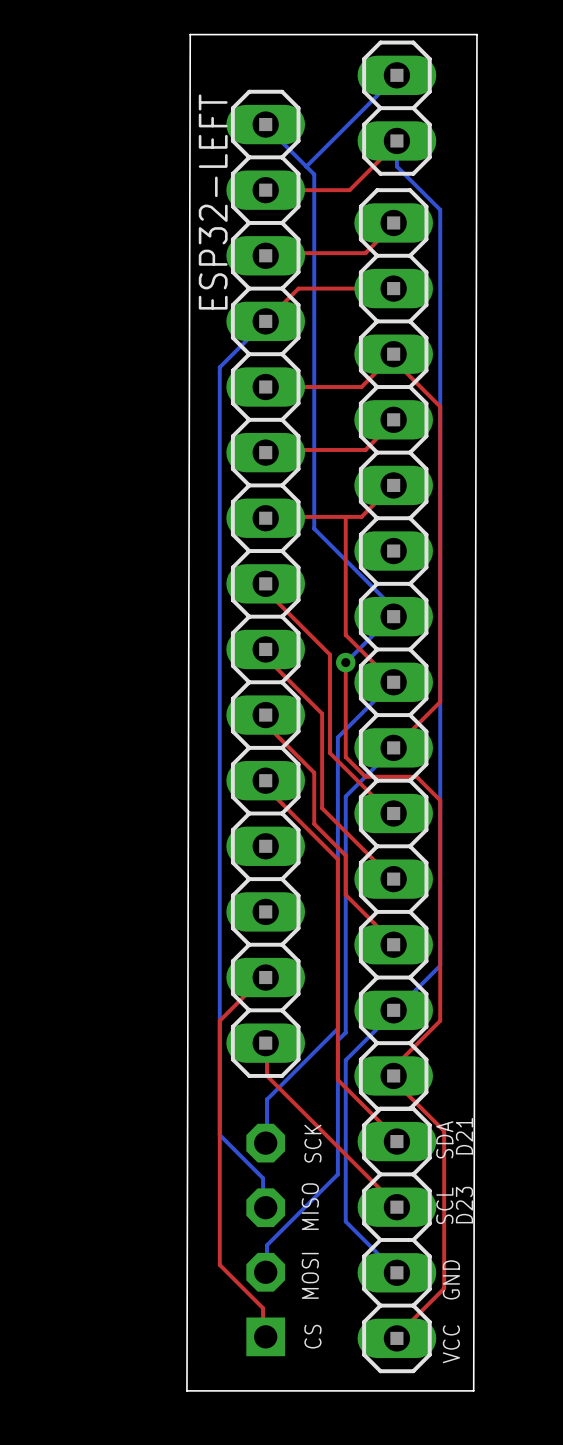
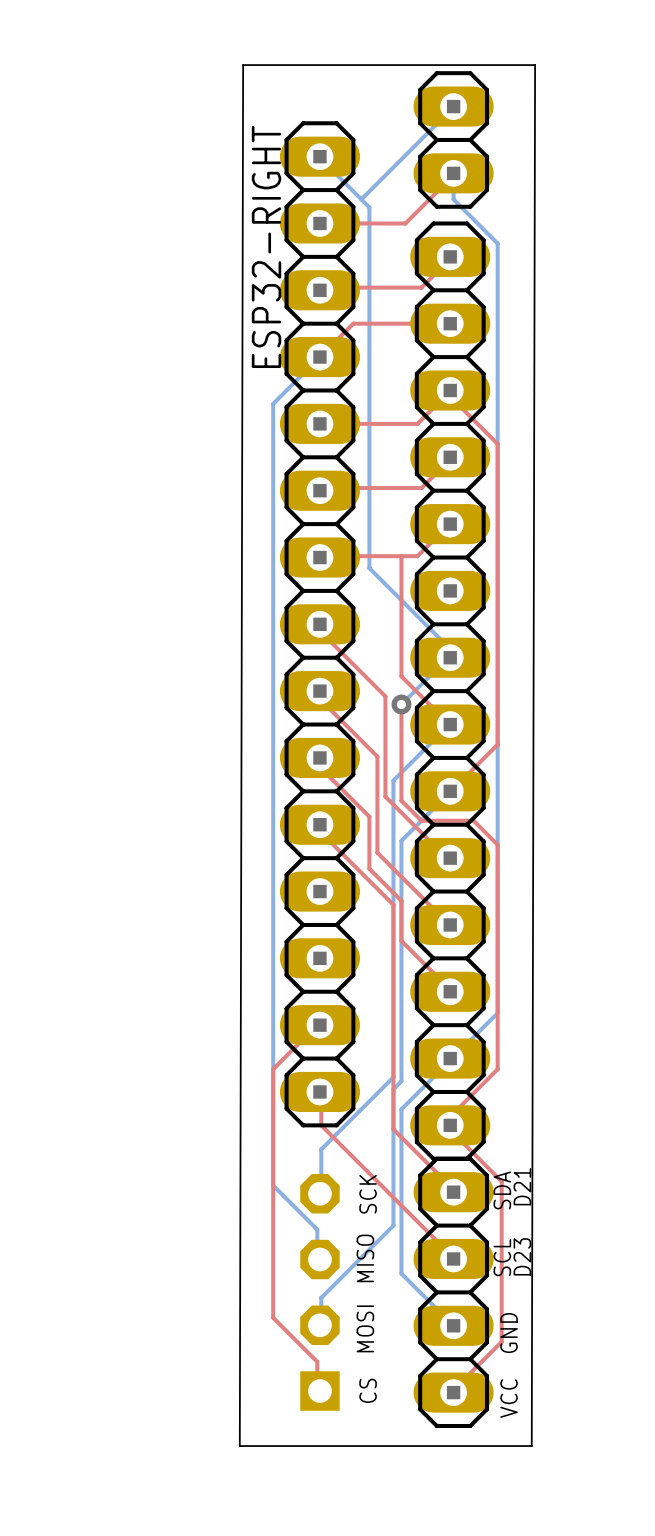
ESP32-LEFT name: ESP32-LEFT (213, 202) -> ESP32-RIGHT (266, 246)

